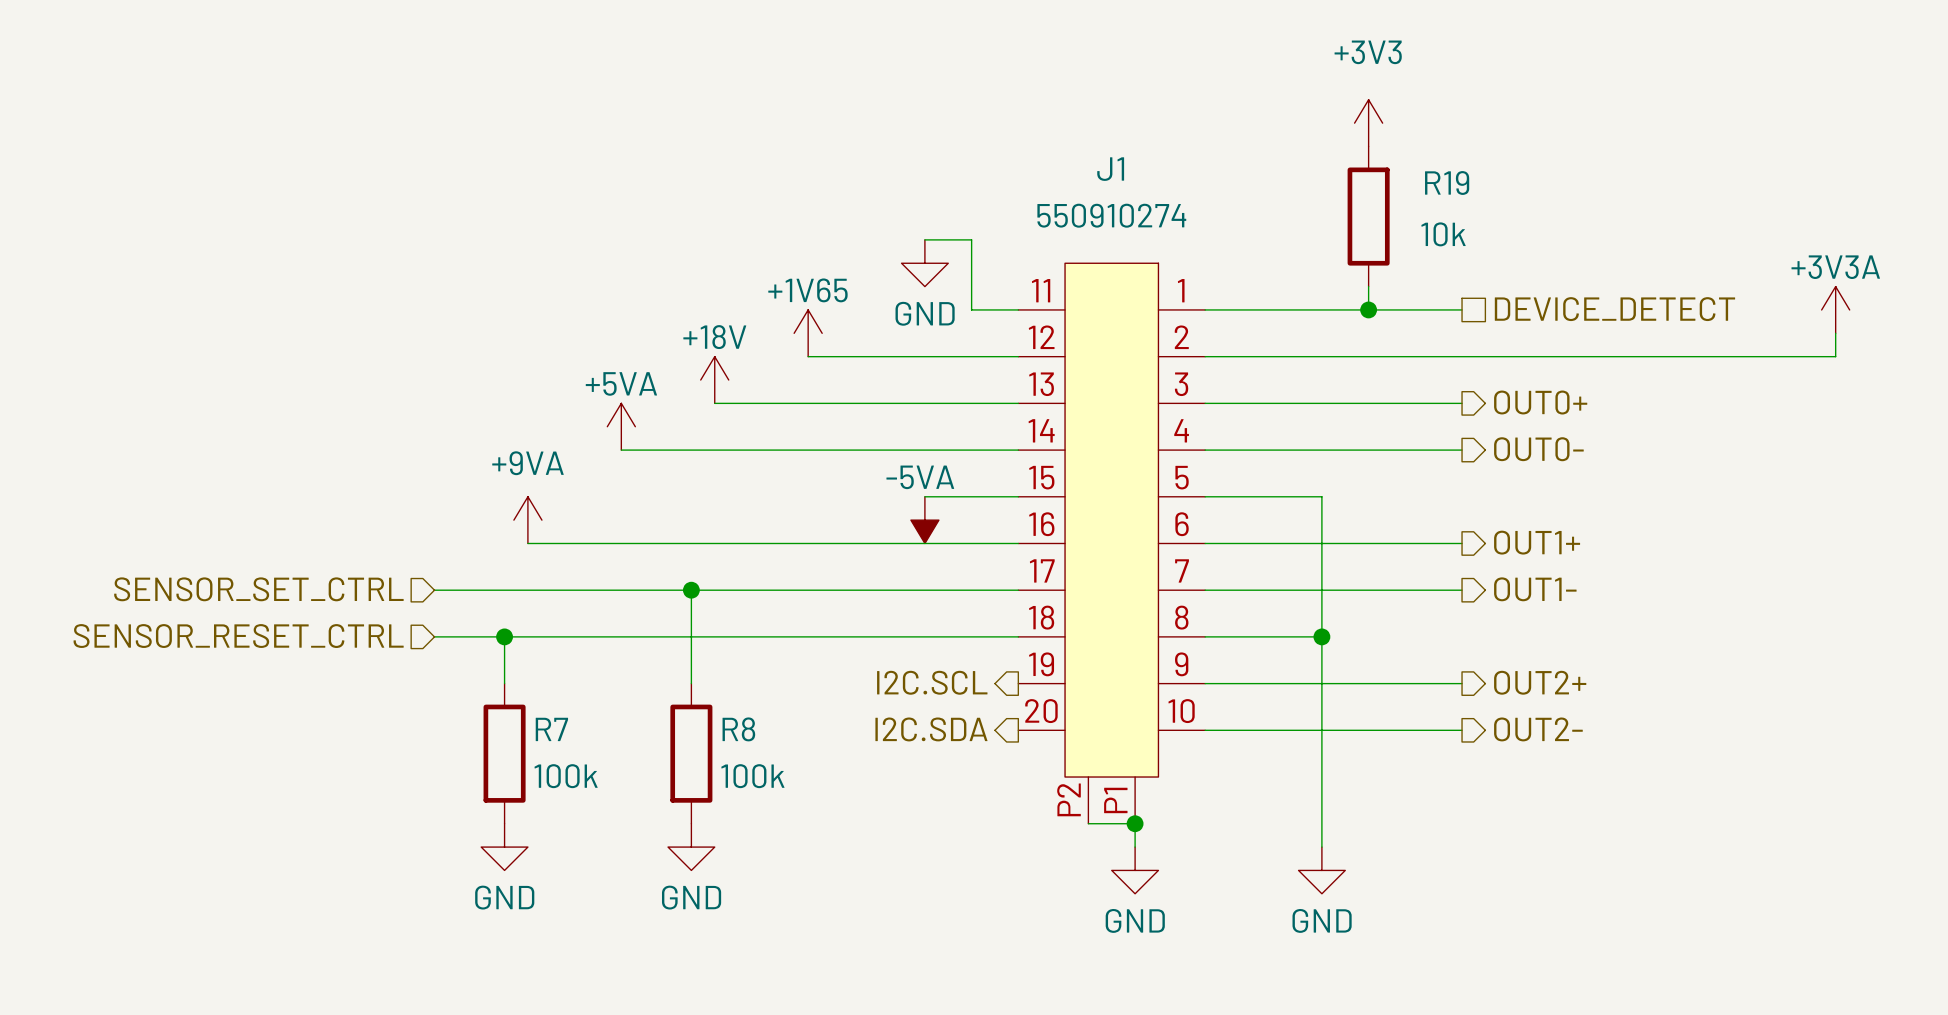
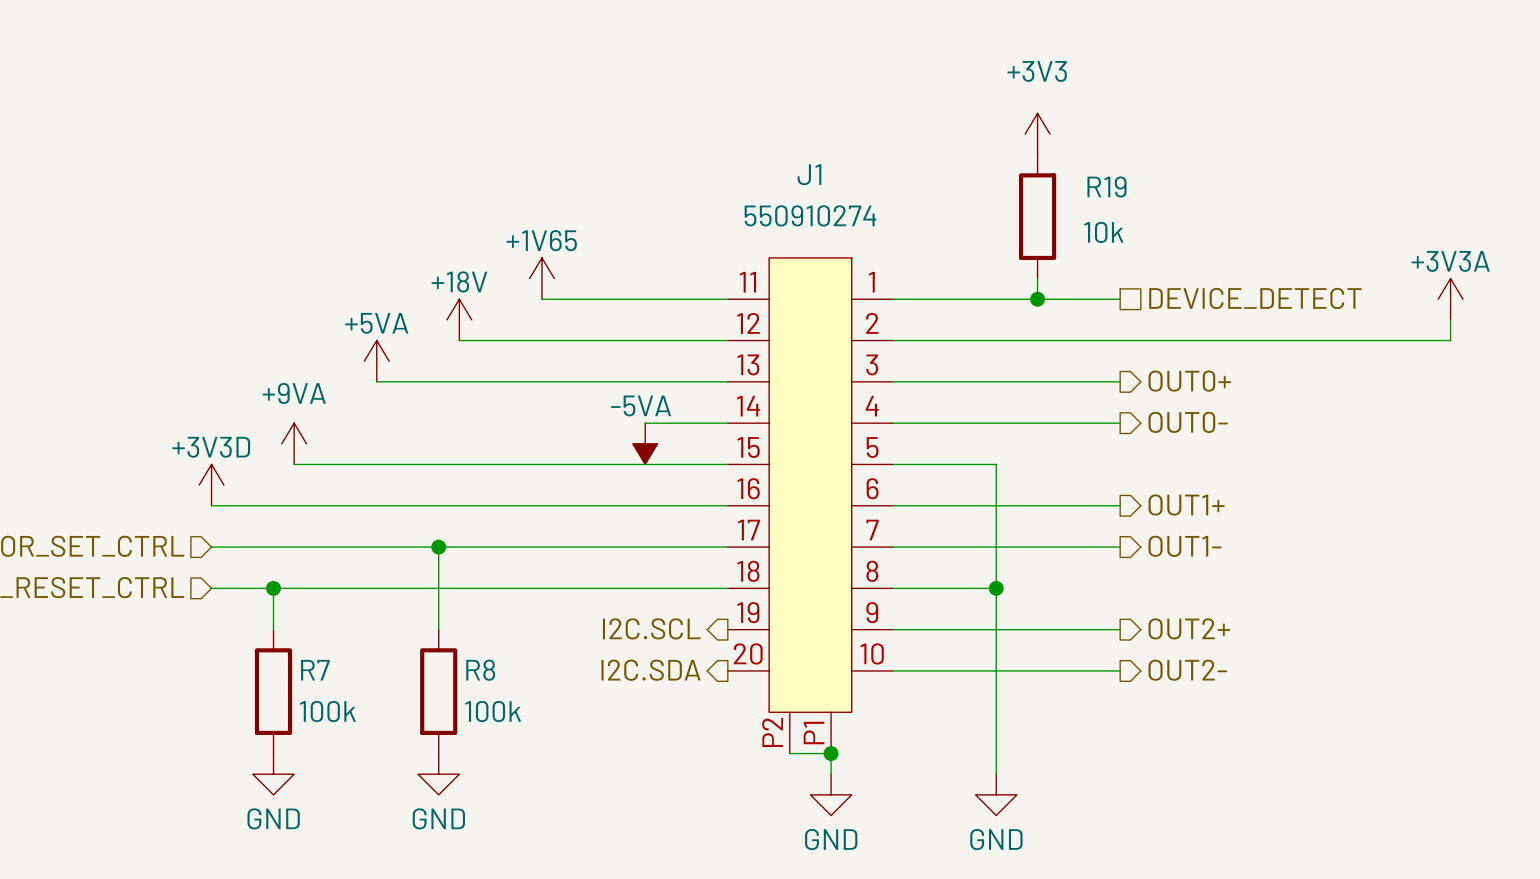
wire: (924, 239) (971, 239) (971, 309) -> (541, 299) (686, 299)
power symbol: GND (924, 263) -> none
power symbol position: +1V65 (808, 333) -> +1V65 (541, 278)
wire: none -> (459, 340) (541, 340)
power symbol position: +18V (714, 380) -> +18V (459, 319)
wire: none -> (376, 381) (459, 381)
power symbol position: +5VA (621, 426) -> +5VA (376, 361)
wire: (621, 450) (924, 450) -> none
wire: none -> (294, 464) (645, 464)
power symbol: none -> +3V3D (211, 485)
power symbol position: +9VA (527, 520) -> +9VA (294, 443)
power symbol position: -5VA (924, 520) -> -5VA (645, 443)
wire: none -> (211, 505) (294, 505)

